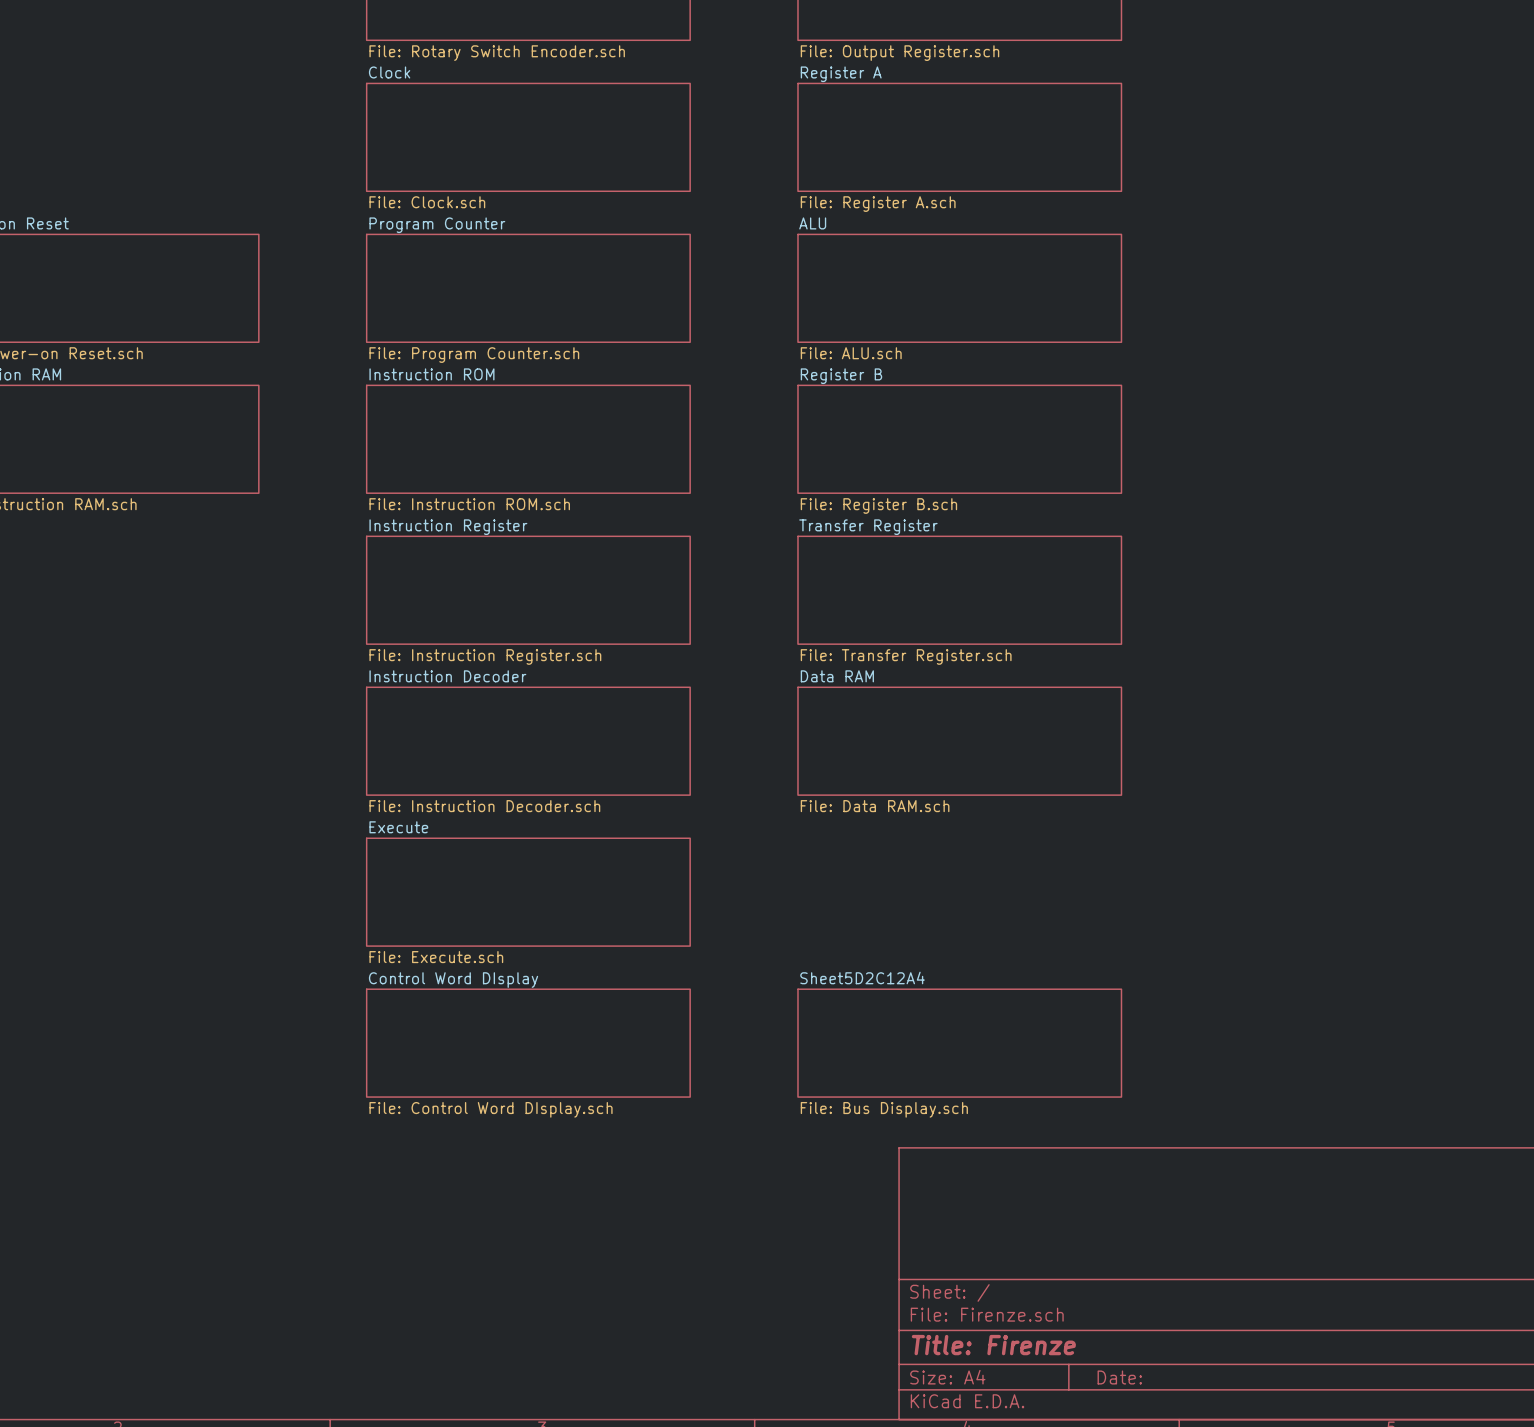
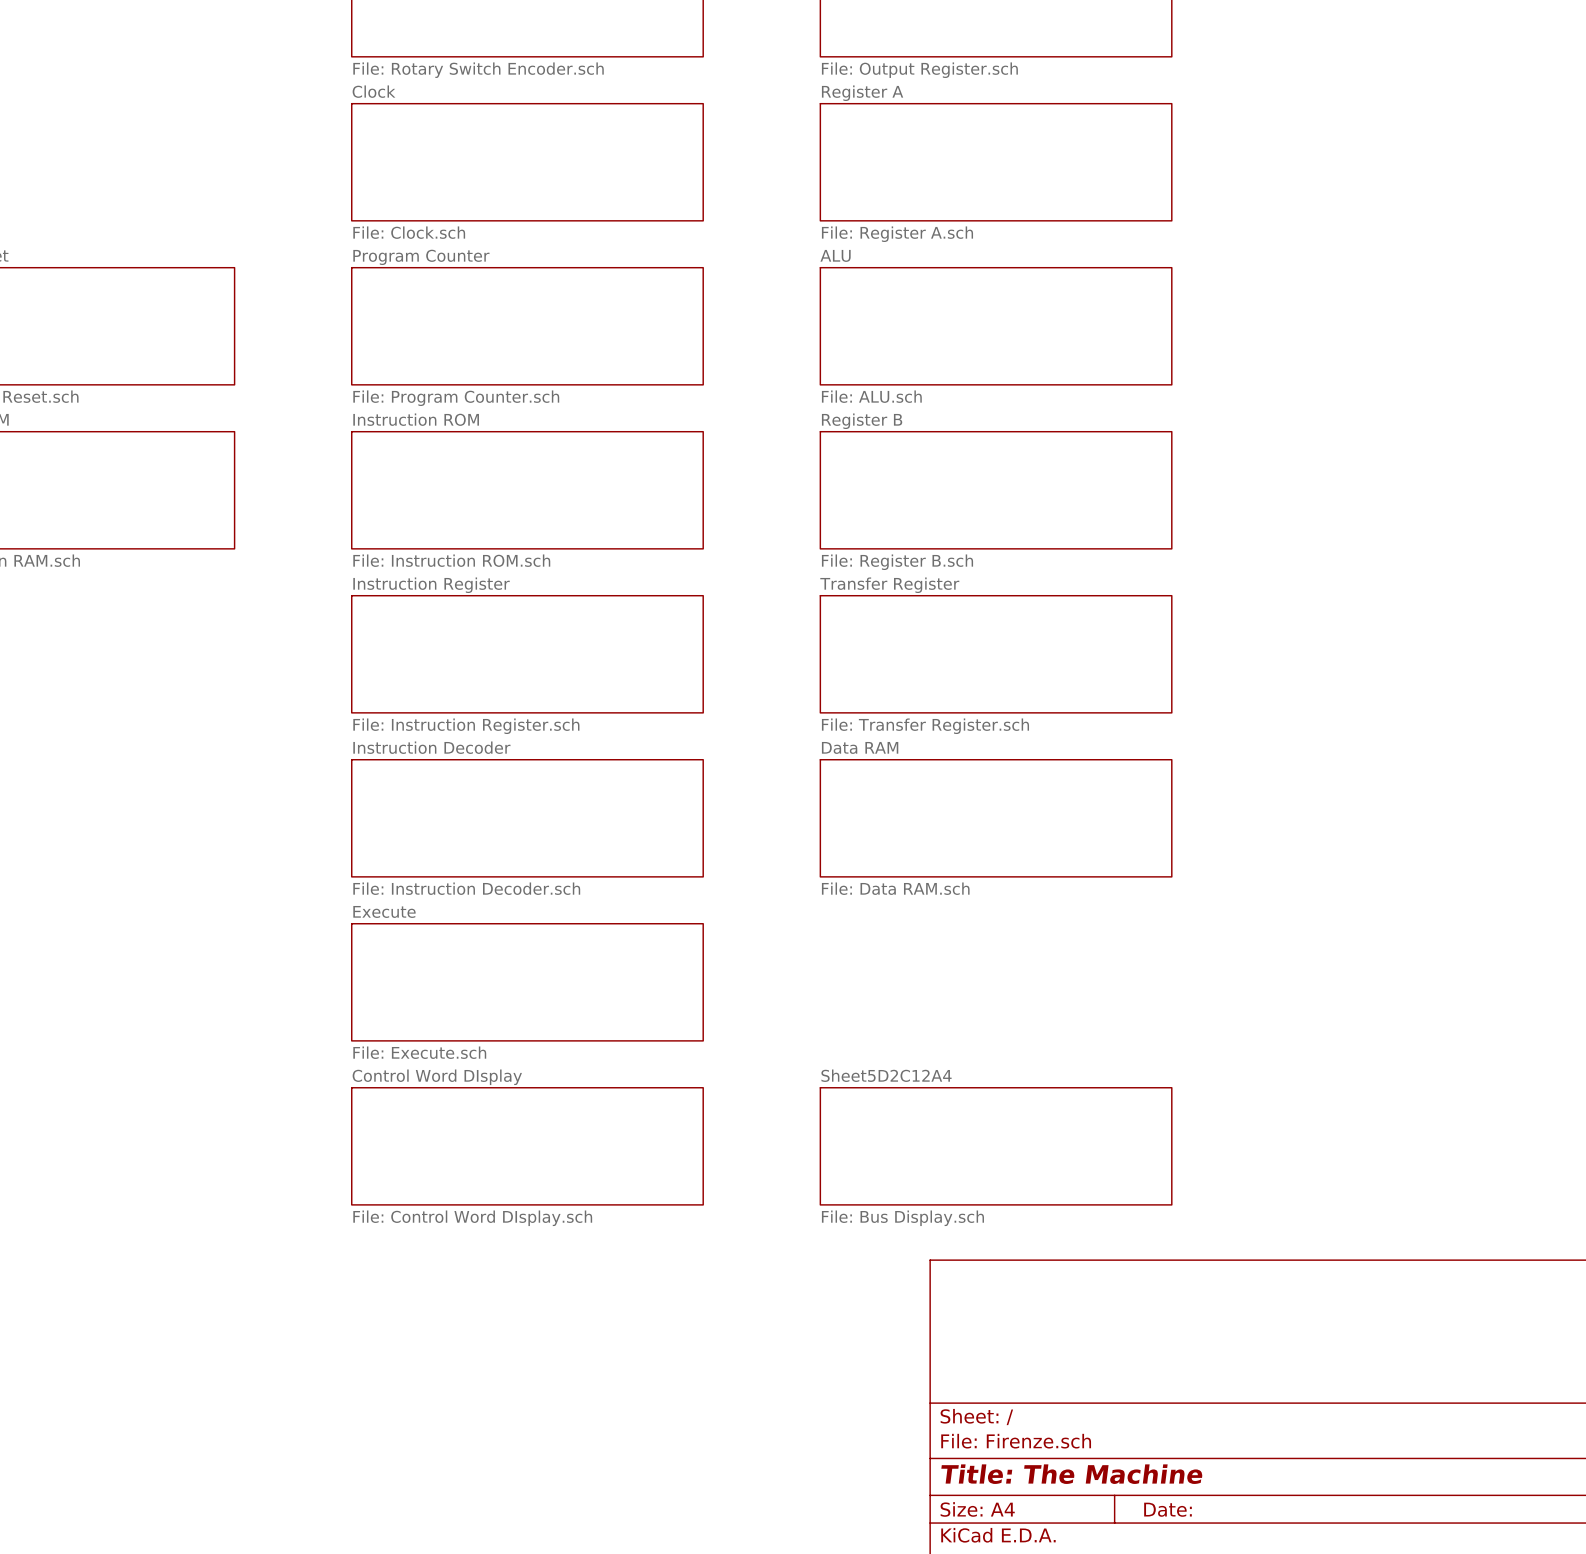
title block: Title: Firenze (993, 1345) -> Title: The Machine (1071, 1474)

